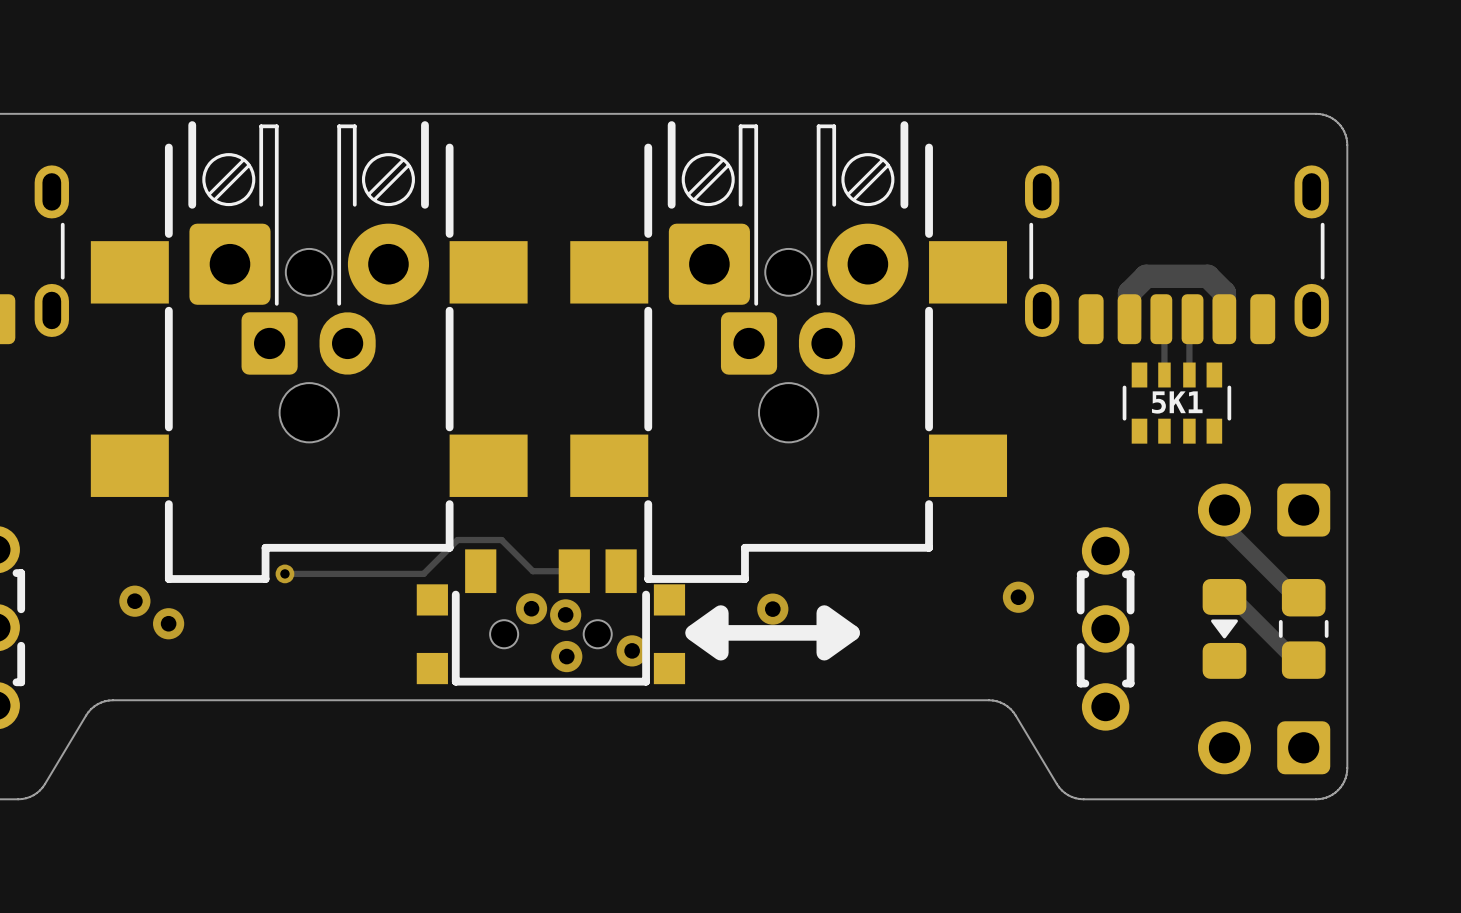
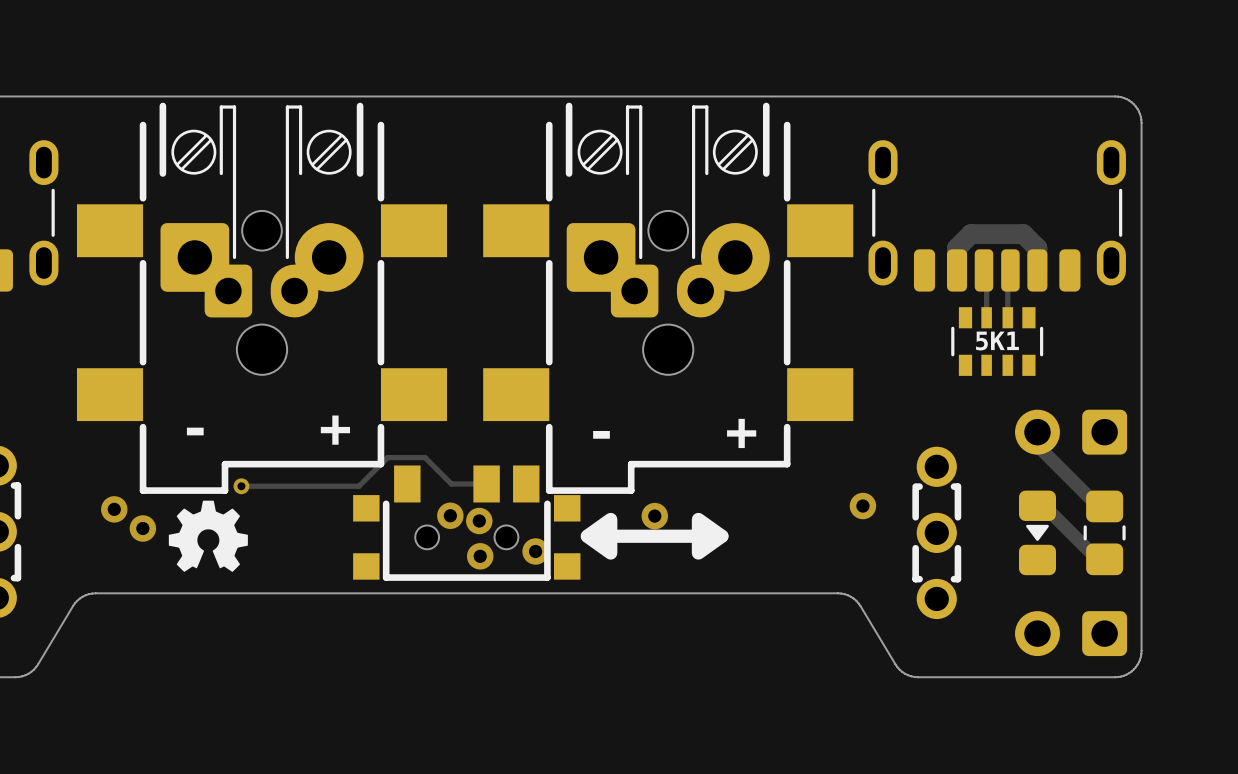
part footprint: [90, 121, 528, 583] -> [76, 102, 448, 494]
part footprint: [570, 121, 1008, 583] -> [483, 102, 854, 494]
text: none -> + (335, 430)
text: none -> - (195, 431)
text: none -> + (741, 433)
text: none -> - (601, 434)
drawing: none -> [168, 500, 248, 572]

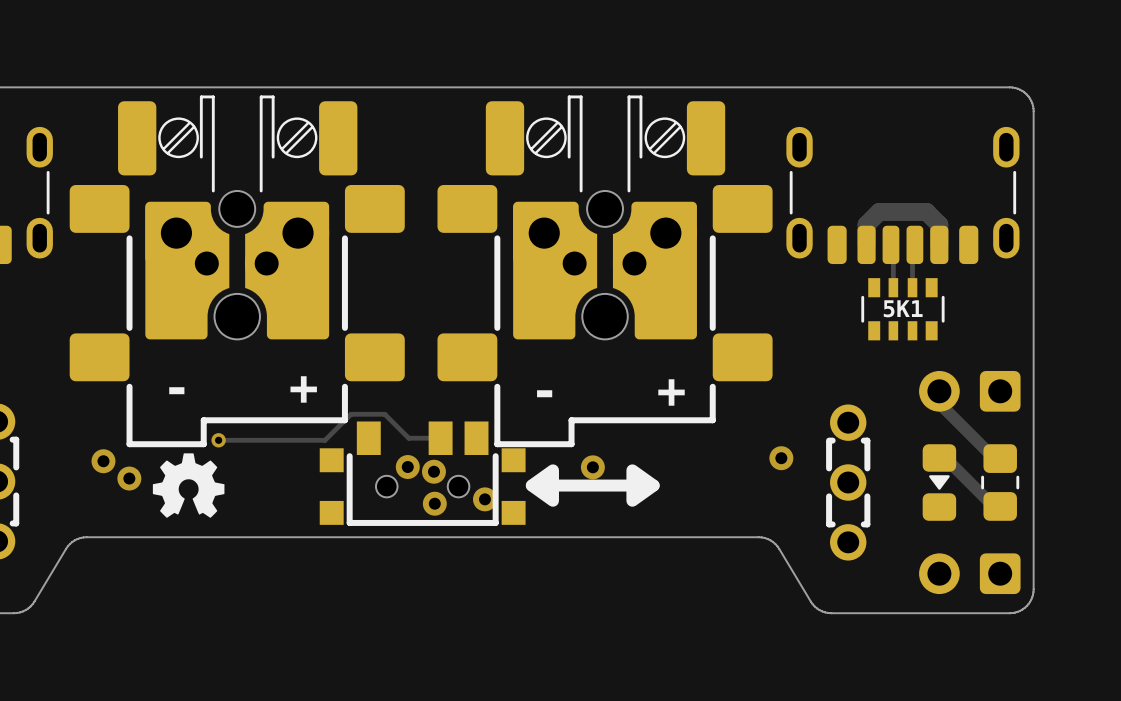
part footprint: [76, 102, 448, 494] -> [69, 95, 405, 448]
part footprint: [483, 102, 854, 494] -> [437, 95, 773, 448]

